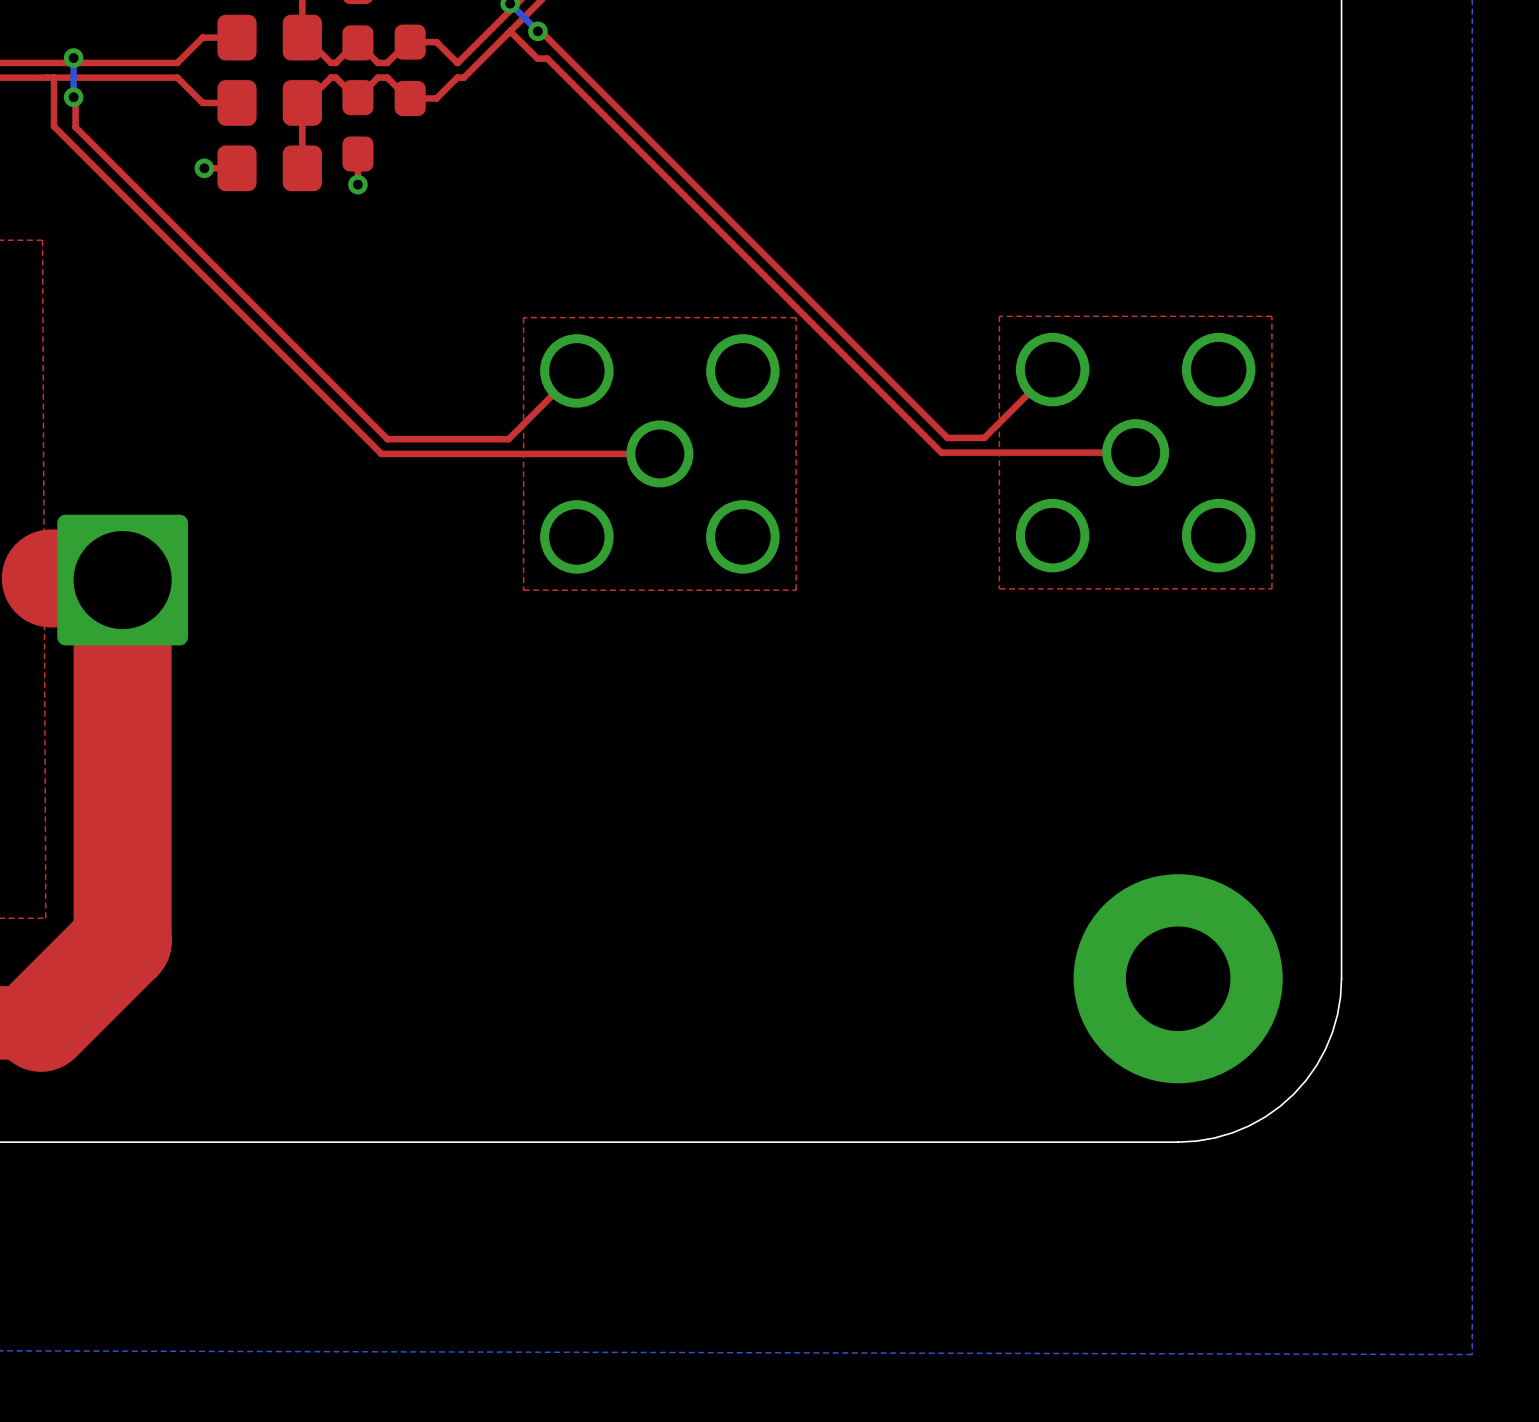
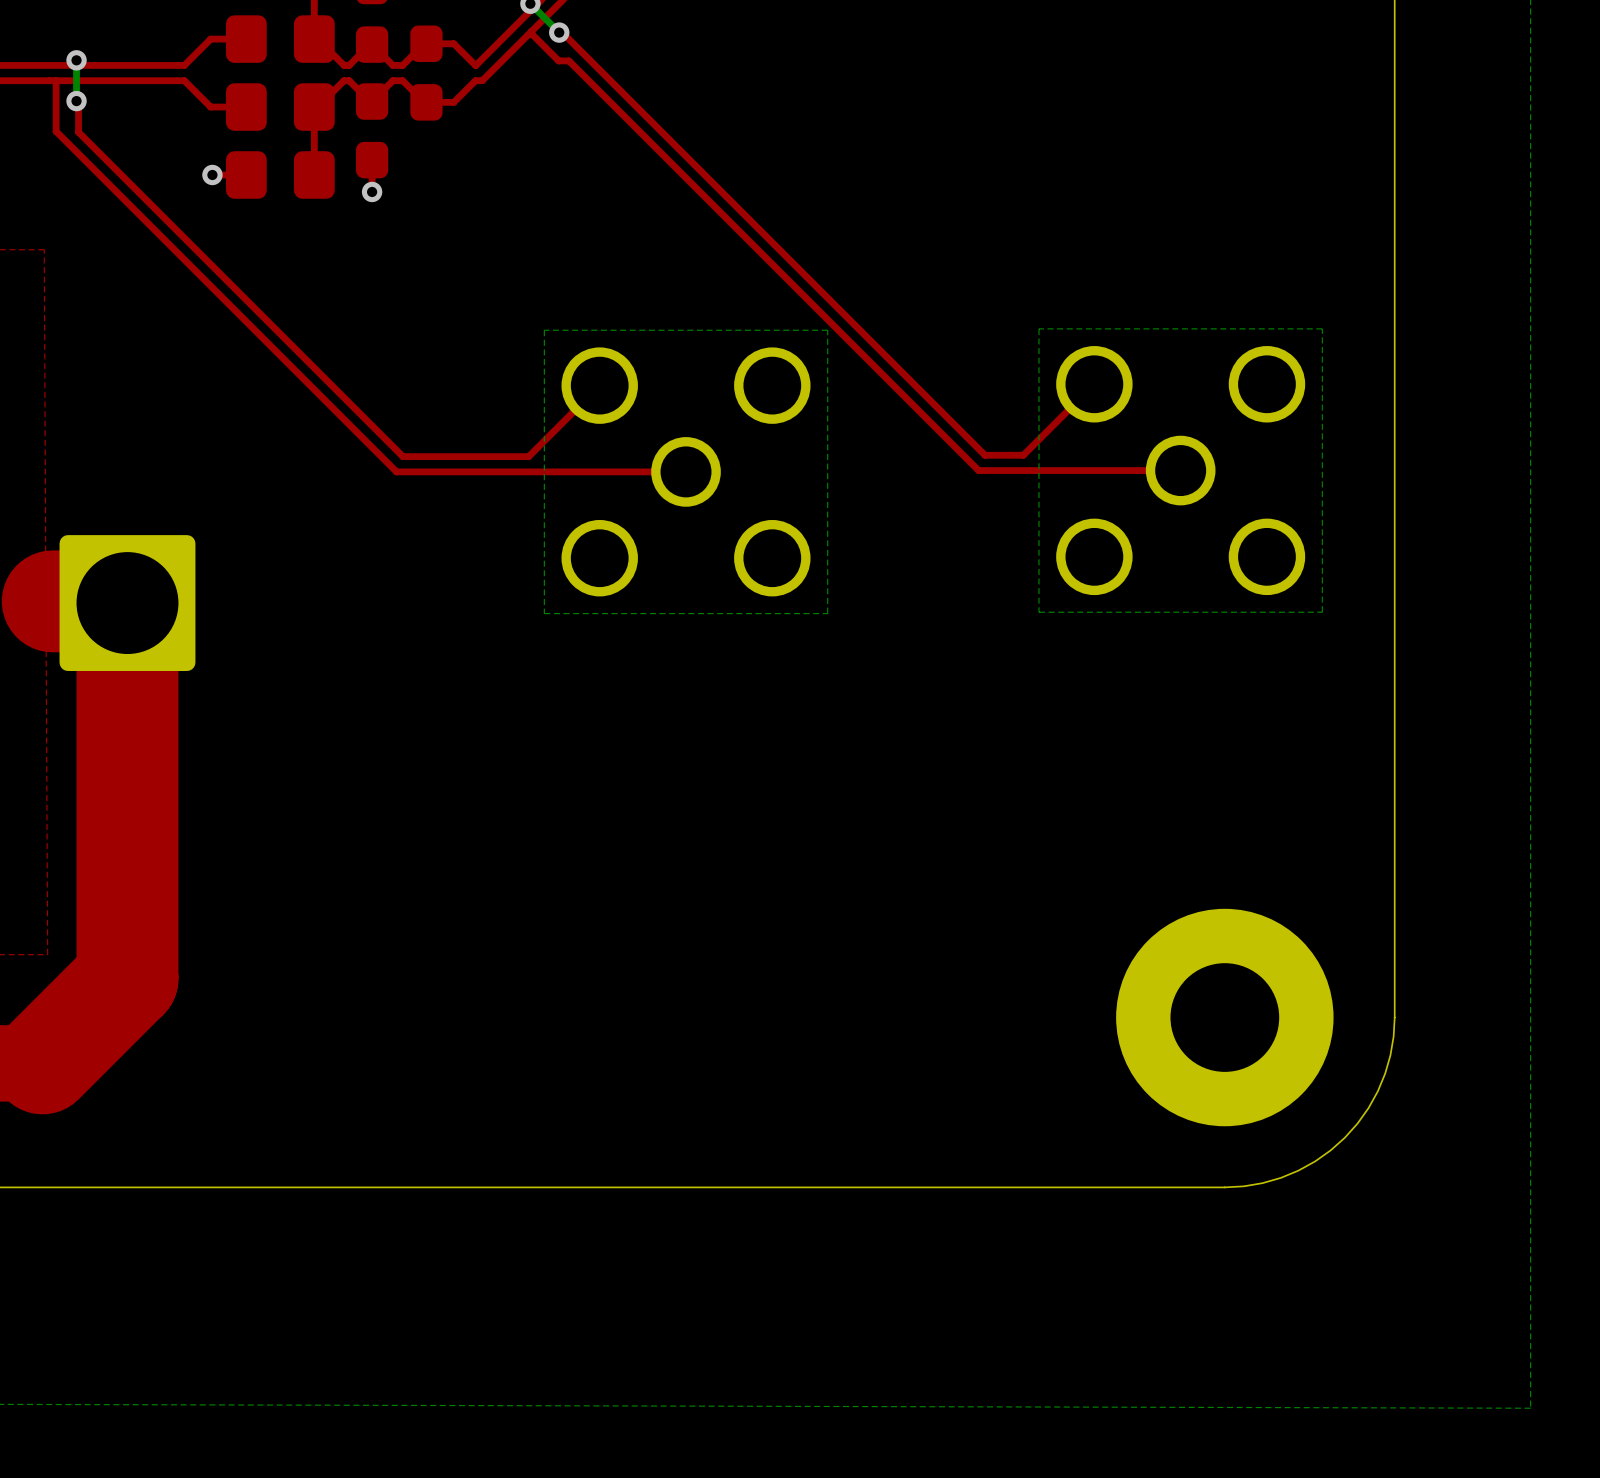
top zone outline: (1271, 316) (999, 316) (999, 588) (1271, 588) (1271, 316) -> none
bottom zone outline: none -> (1322, 328) (1039, 328) (1039, 612) (1322, 612) (1322, 328)
top zone outline: (796, 317) (523, 317) (523, 590) (796, 590) (796, 317) -> none
bottom zone outline: none -> (827, 330) (544, 330) (544, 613) (827, 613) (827, 330)

